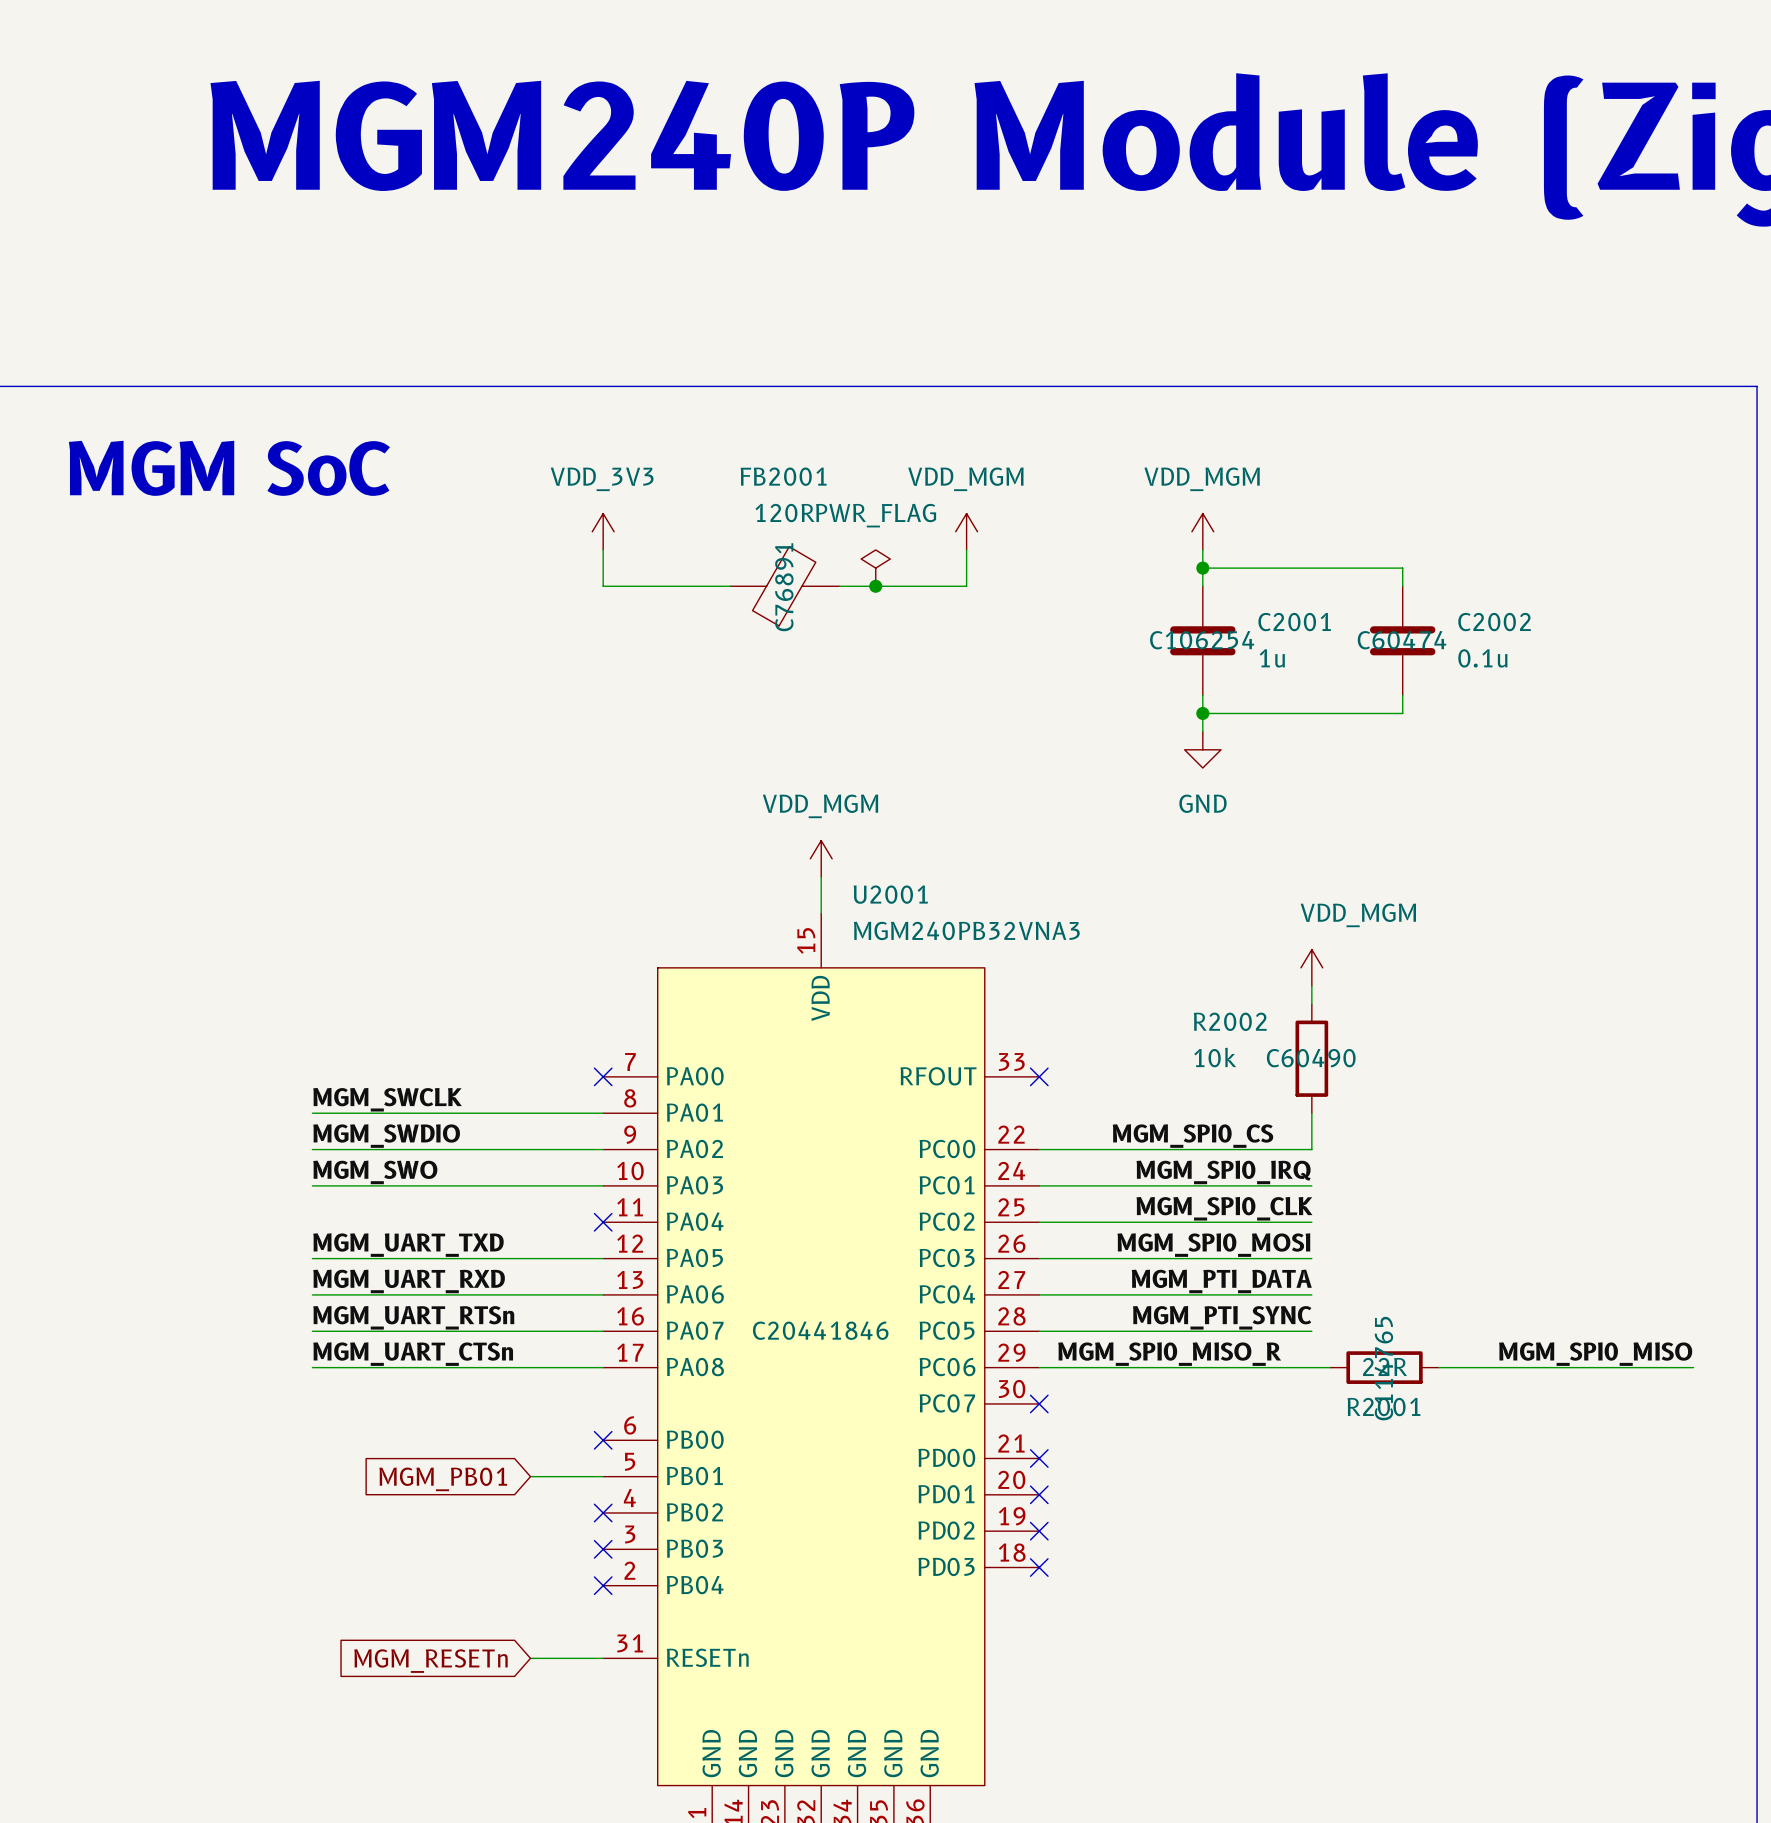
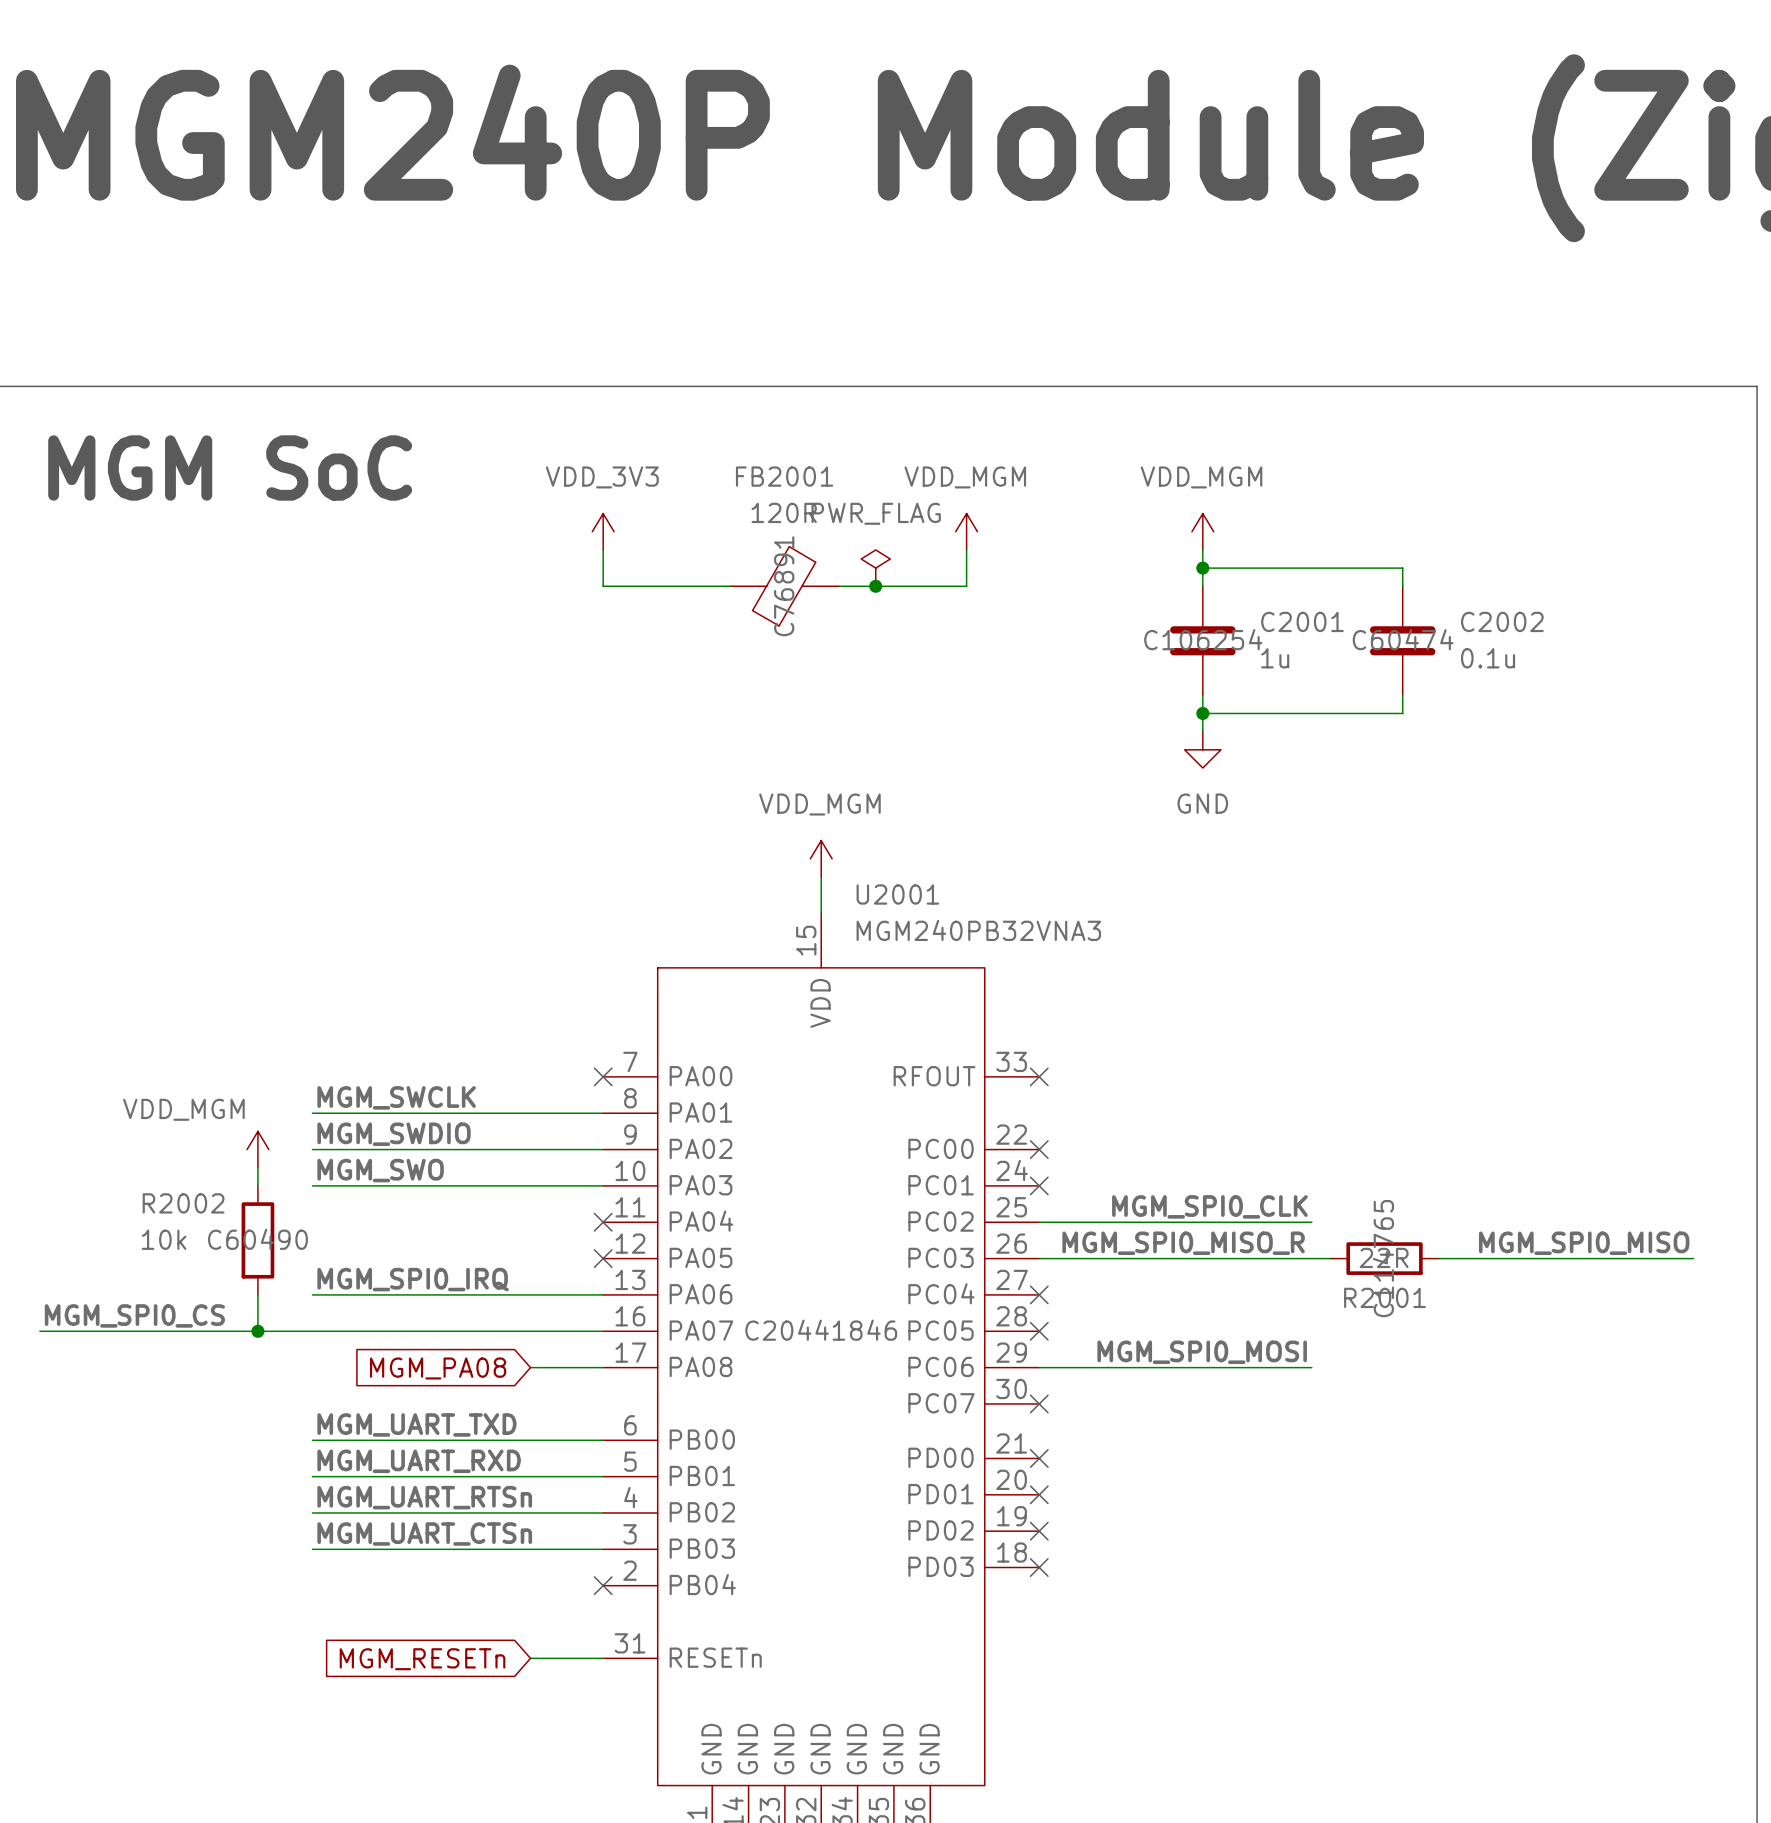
power symbol: VDD_MGM (1311, 967) -> none
wire: (1311, 986) (1311, 1004) -> none
R2002 position: (1311, 1058) -> (257, 1240)
wire: (1311, 1113) (1311, 1149) (1039, 1149) -> none
label: MGM_SPI0_CS (1193, 1136) -> none
power symbol: none -> VDD_MGM (257, 1149)
no-connect mark: none -> (1039, 1149)
wire: none -> (257, 1167) (257, 1185)
label: MGM_SPI0_IRQ (1223, 1172) -> none
wire: (1039, 1185) (1311, 1185) -> none
no-connect mark: none -> (1039, 1185)
label position: MGM_UART_TXD (408, 1245) -> MGM_UART_TXD (416, 1424)
label position: MGM_SPI0_MOSI (1213, 1245) -> MGM_SPI0_MOSI (1202, 1352)
wire: (312, 1258) (603, 1258) -> (312, 1440) (603, 1440)
no-connect mark: none -> (603, 1258)
label: MGM_UART_RXD (409, 1281) -> MGM_SPI0_IRQ (413, 1279)
label: MGM_PTI_DATA (1221, 1281) -> none
wire: none -> (257, 1294) (257, 1331)
wire: (1039, 1294) (1311, 1294) -> none
no-connect mark: none -> (1039, 1294)
label: none -> MGM_SPI0_CS (134, 1315)
label position: MGM_UART_RTSn (413, 1317) -> MGM_UART_RTSn (424, 1497)
label: MGM_PTI_SYNC (1222, 1317) -> none
wire: none -> (39, 1331) (312, 1331)
junction: none -> (257, 1331)
wire: (1039, 1331) (1311, 1331) -> none
no-connect mark: none -> (1039, 1331)
label position: MGM_UART_CTSn (413, 1354) -> MGM_UART_CTSn (424, 1533)
label position: MGM_SPI0_MISO_R (1169, 1354) -> MGM_SPI0_MISO_R (1183, 1243)
label position: MGM_SPI0_MISO (1595, 1354) -> MGM_SPI0_MISO (1584, 1243)
wire: (312, 1367) (530, 1367) -> (312, 1476) (530, 1476)
wire: (1311, 1367) (1330, 1367) -> (1311, 1258) (1330, 1258)
R2001 position: (1384, 1367) -> (1384, 1258)
wire: (1439, 1367) (1693, 1367) -> (1439, 1258) (1693, 1258)
global label: none -> MGM_PA08 (438, 1368)
no-connect mark: (603, 1440) -> none
label: none -> MGM_UART_RXD (419, 1461)
global label: MGM_PB01 (443, 1479) -> none
wire: none -> (312, 1512) (603, 1512)
no-connect mark: (603, 1512) -> none
wire: none -> (312, 1549) (603, 1549)
no-connect mark: (603, 1549) -> none

